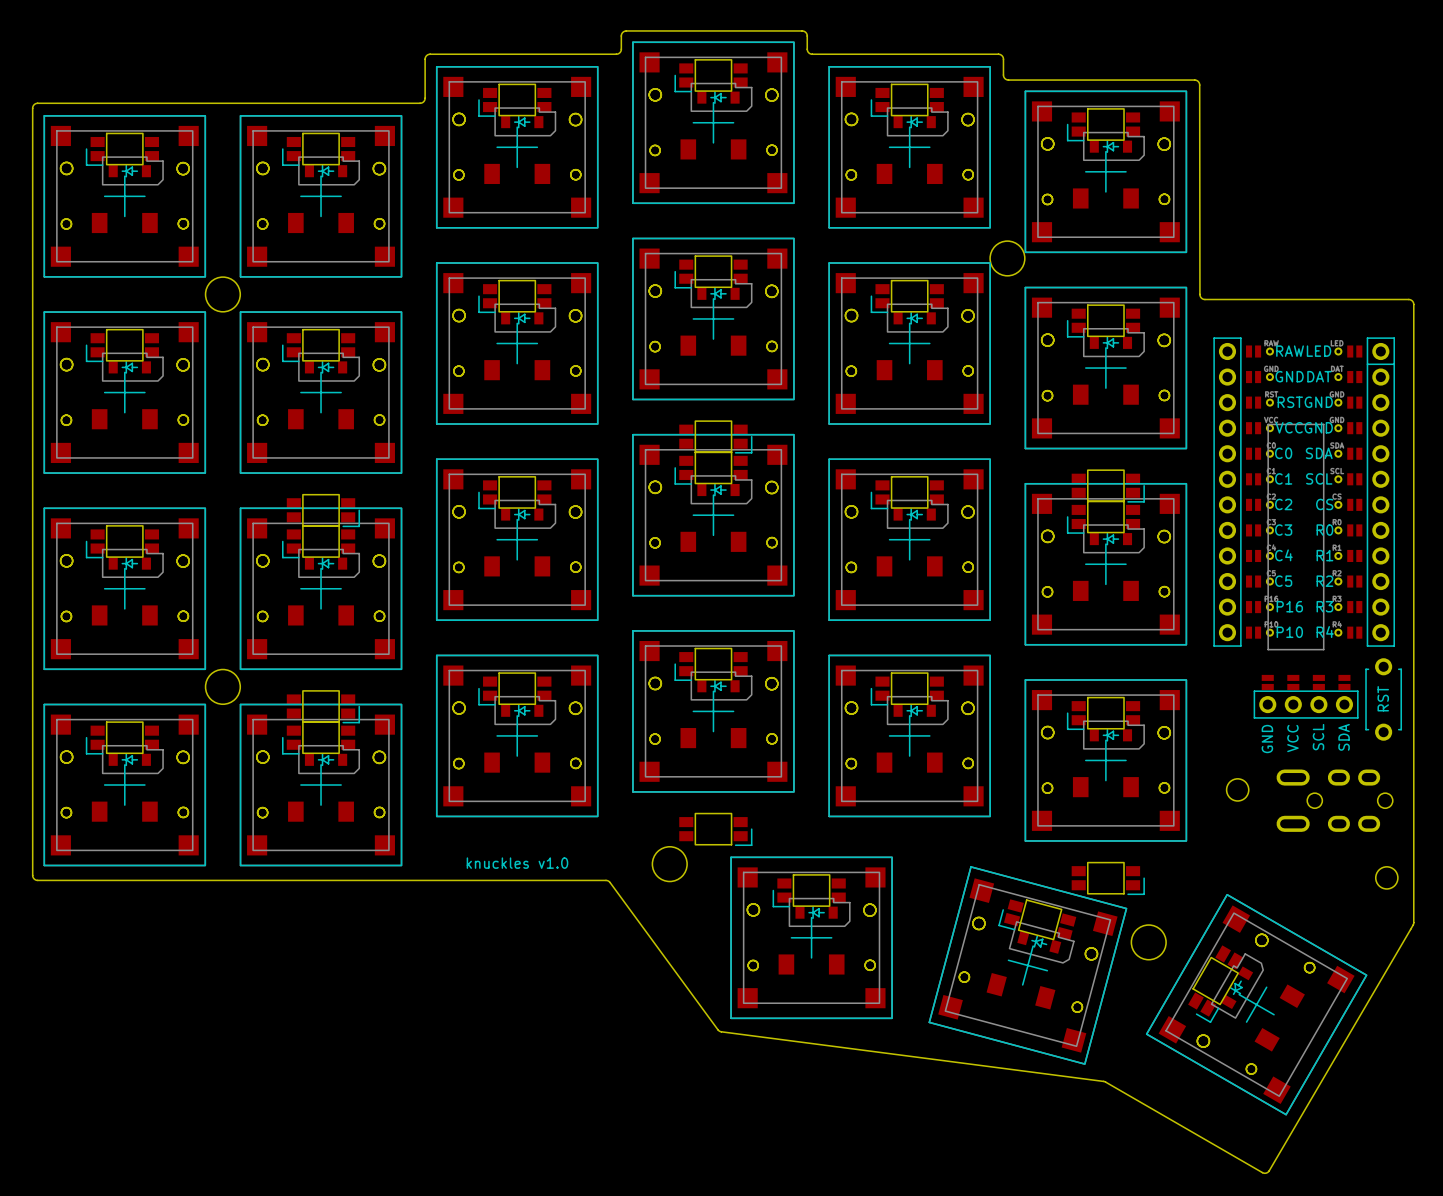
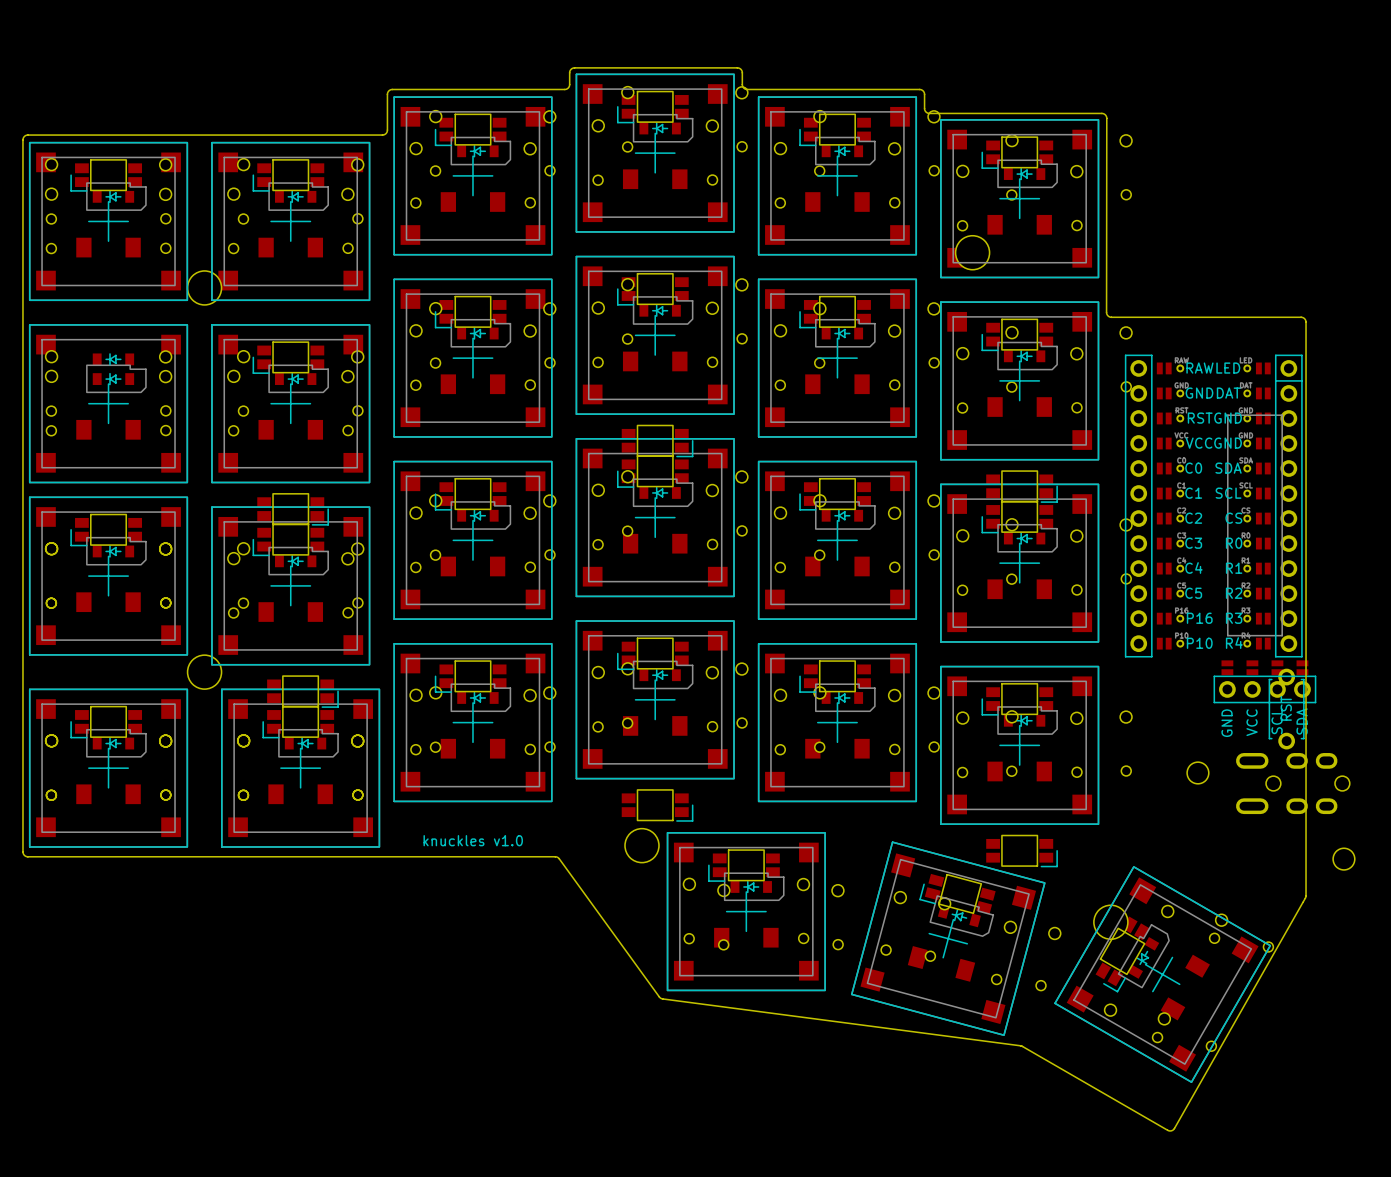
board edge: (626, 30) (802, 31) (806, 34) (807, 50) (811, 54) (999, 54) (1003, 58) (1003, 76) (1007, 80) (1196, 80) (1199, 85) (1201, 298) (1408, 299) (1413, 301) (1413, 923) (1267, 1172) (1262, 1172) (1104, 1081) (719, 1031) (607, 880) (37, 880) (33, 877) (33, 105) (37, 103) (420, 103) (425, 98) (425, 58) (428, 54) (616, 54) (621, 50) (621, 34) (626, 30) -> (574, 67) (570, 70) (569, 85) (565, 89) (390, 89) (387, 93) (387, 130) (383, 135) (27, 135) (23, 137) (23, 854) (27, 856) (556, 856) (661, 998) (1021, 1045) (1167, 1130) (1172, 1130) (1305, 896) (1305, 319) (1301, 317) (1107, 315) (1106, 118) (1103, 113) (928, 113) (924, 109) (924, 92) (920, 89) (746, 89) (742, 85) (742, 71) (737, 67) (574, 67)
part position: (711, 75) -> (652, 107)
part position: (718, 97) -> (660, 128)
part position: (514, 100) -> (470, 129)
part position: (907, 100) -> (835, 129)
part footprint: [43, 115, 206, 278] -> [92, 190, 135, 203]
part footprint: [239, 115, 403, 278] -> [274, 190, 317, 203]
part position: (522, 122) -> (477, 151)
part position: (713, 122) -> (655, 153)
part position: (914, 122) -> (842, 151)
part position: (1103, 124) -> (1017, 152)
part position: (1110, 146) -> (1024, 174)
part position: (517, 147) -> (472, 175)
part position: (909, 147) -> (837, 175)
part position: (122, 149) -> (106, 175)
part position: (318, 149) -> (288, 175)
part: (129, 171) -> none
part: (326, 171) -> none
part position: (1105, 171) -> (1019, 198)
part: none -> (108, 221)
part: none -> (290, 221)
part position: (711, 271) -> (652, 289)
part position: (718, 293) -> (660, 310)
part position: (514, 296) -> (470, 312)
part position: (907, 296) -> (835, 312)
part footprint: [43, 311, 206, 474] -> [92, 373, 135, 385]
part footprint: [239, 311, 403, 474] -> [274, 373, 317, 385]
part position: (522, 318) -> (477, 333)
part position: (713, 318) -> (655, 335)
part position: (914, 318) -> (842, 333)
part position: (1103, 320) -> (1017, 334)
part position: (1110, 342) -> (1024, 356)
part position: (517, 343) -> (472, 358)
part position: (909, 343) -> (837, 358)
part: (122, 345) -> none
part position: (318, 345) -> (288, 357)
part: (326, 367) -> none
part position: (1105, 368) -> (1019, 380)
part: none -> (108, 403)
part: none -> (290, 403)
part position: (715, 436) -> (657, 441)
part position: (711, 468) -> (652, 471)
part position: (1108, 486) -> (1021, 486)
part position: (718, 490) -> (660, 492)
part position: (514, 492) -> (470, 494)
part position: (907, 492) -> (835, 494)
part position: (1304, 492) -> (1213, 506)
part position: (323, 510) -> (293, 509)
part position: (522, 514) -> (477, 515)
part position: (914, 514) -> (842, 515)
part position: (713, 515) -> (655, 517)
part position: (1103, 517) -> (1017, 517)
part position: (517, 539) -> (472, 540)
part position: (909, 539) -> (837, 540)
part position: (1110, 539) -> (1024, 538)
part position: (318, 541) -> (288, 539)
part position: (326, 563) -> (295, 561)
part position: (1105, 564) -> (1019, 563)
part position: (321, 588) -> (290, 585)
part position: (711, 664) -> (652, 653)
part position: (718, 686) -> (660, 675)
part position: (514, 688) -> (470, 676)
part position: (907, 688) -> (835, 676)
part position: (1383, 699) -> (1286, 709)
part position: (522, 710) -> (477, 697)
part position: (914, 710) -> (842, 697)
part position: (713, 711) -> (655, 699)
part position: (1103, 713) -> (1017, 699)
part position: (517, 735) -> (472, 722)
part position: (909, 735) -> (837, 722)
part position: (1110, 735) -> (1024, 720)
part position: (1105, 760) -> (1019, 745)
part position: (715, 829) -> (657, 805)
text position: knuckles v1.0 (517, 863) -> knuckles v1.0 (473, 840)
part position: (1108, 878) -> (1021, 851)
part position: (809, 890) -> (744, 865)
part position: (816, 912) -> (751, 886)
part position: (1037, 919) -> (957, 893)
part position: (811, 937) -> (746, 911)
part position: (1039, 942) -> (959, 916)
part position: (1027, 965) -> (948, 938)
part position: (1215, 984) -> (1122, 954)
part position: (1237, 987) -> (1143, 957)
part position: (1256, 1004) -> (1162, 974)

